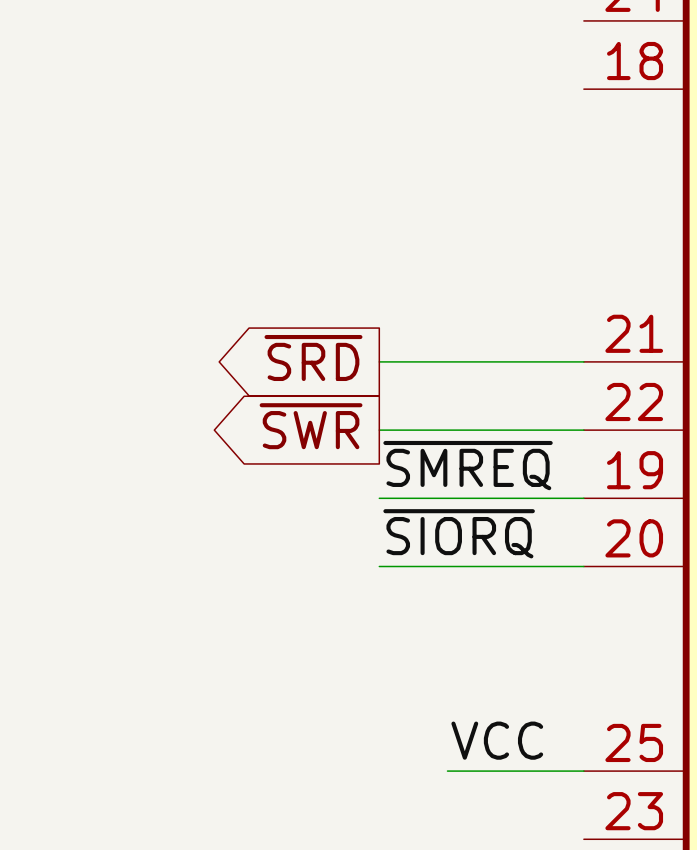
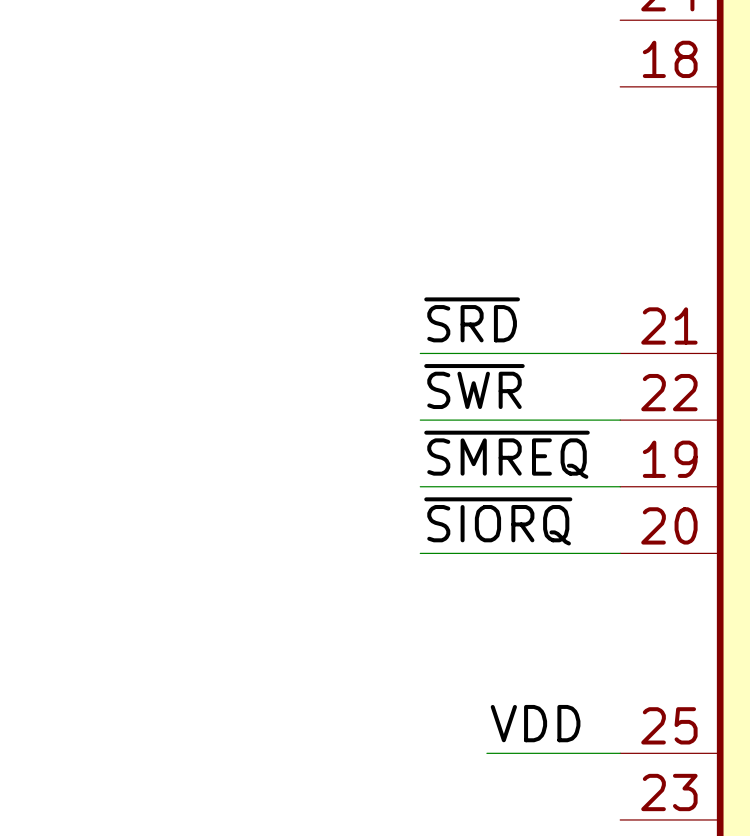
label: none -> ~{SRD} (472, 319)
global label: ~{SRD} (313, 358) -> none
label: none -> ~{SWR} (474, 386)
global label: ~{SWR} (311, 426) -> none
label: VCC (497, 740) -> VDD (535, 723)

